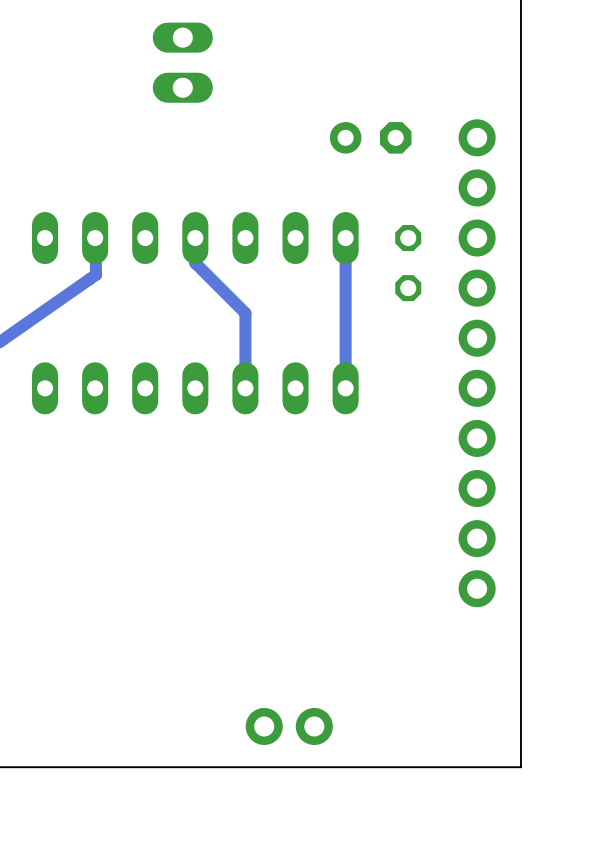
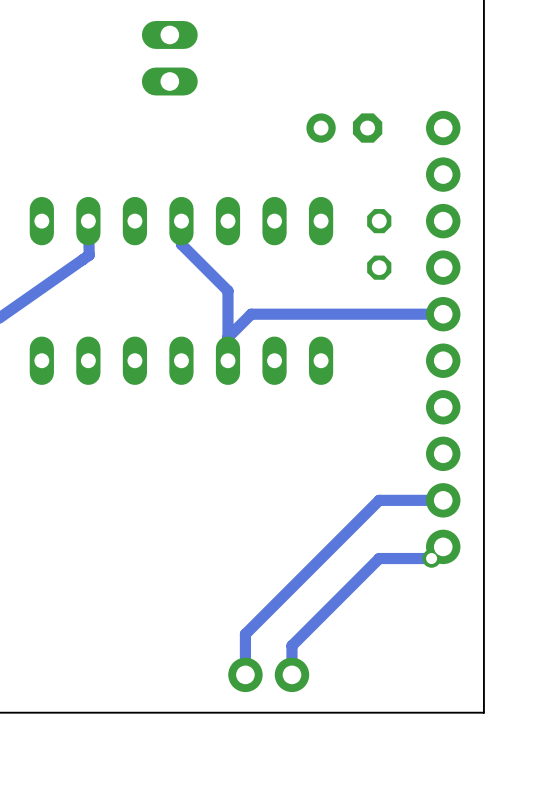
track: (345, 238) (345, 388) -> none
track: none -> (443, 314) (251, 314) (227, 337)
track: none -> (443, 500) (379, 500) (245, 634) (245, 674)
track: none -> (431, 558) (379, 558) (291, 645) (291, 674)
via: none -> (431, 558)

